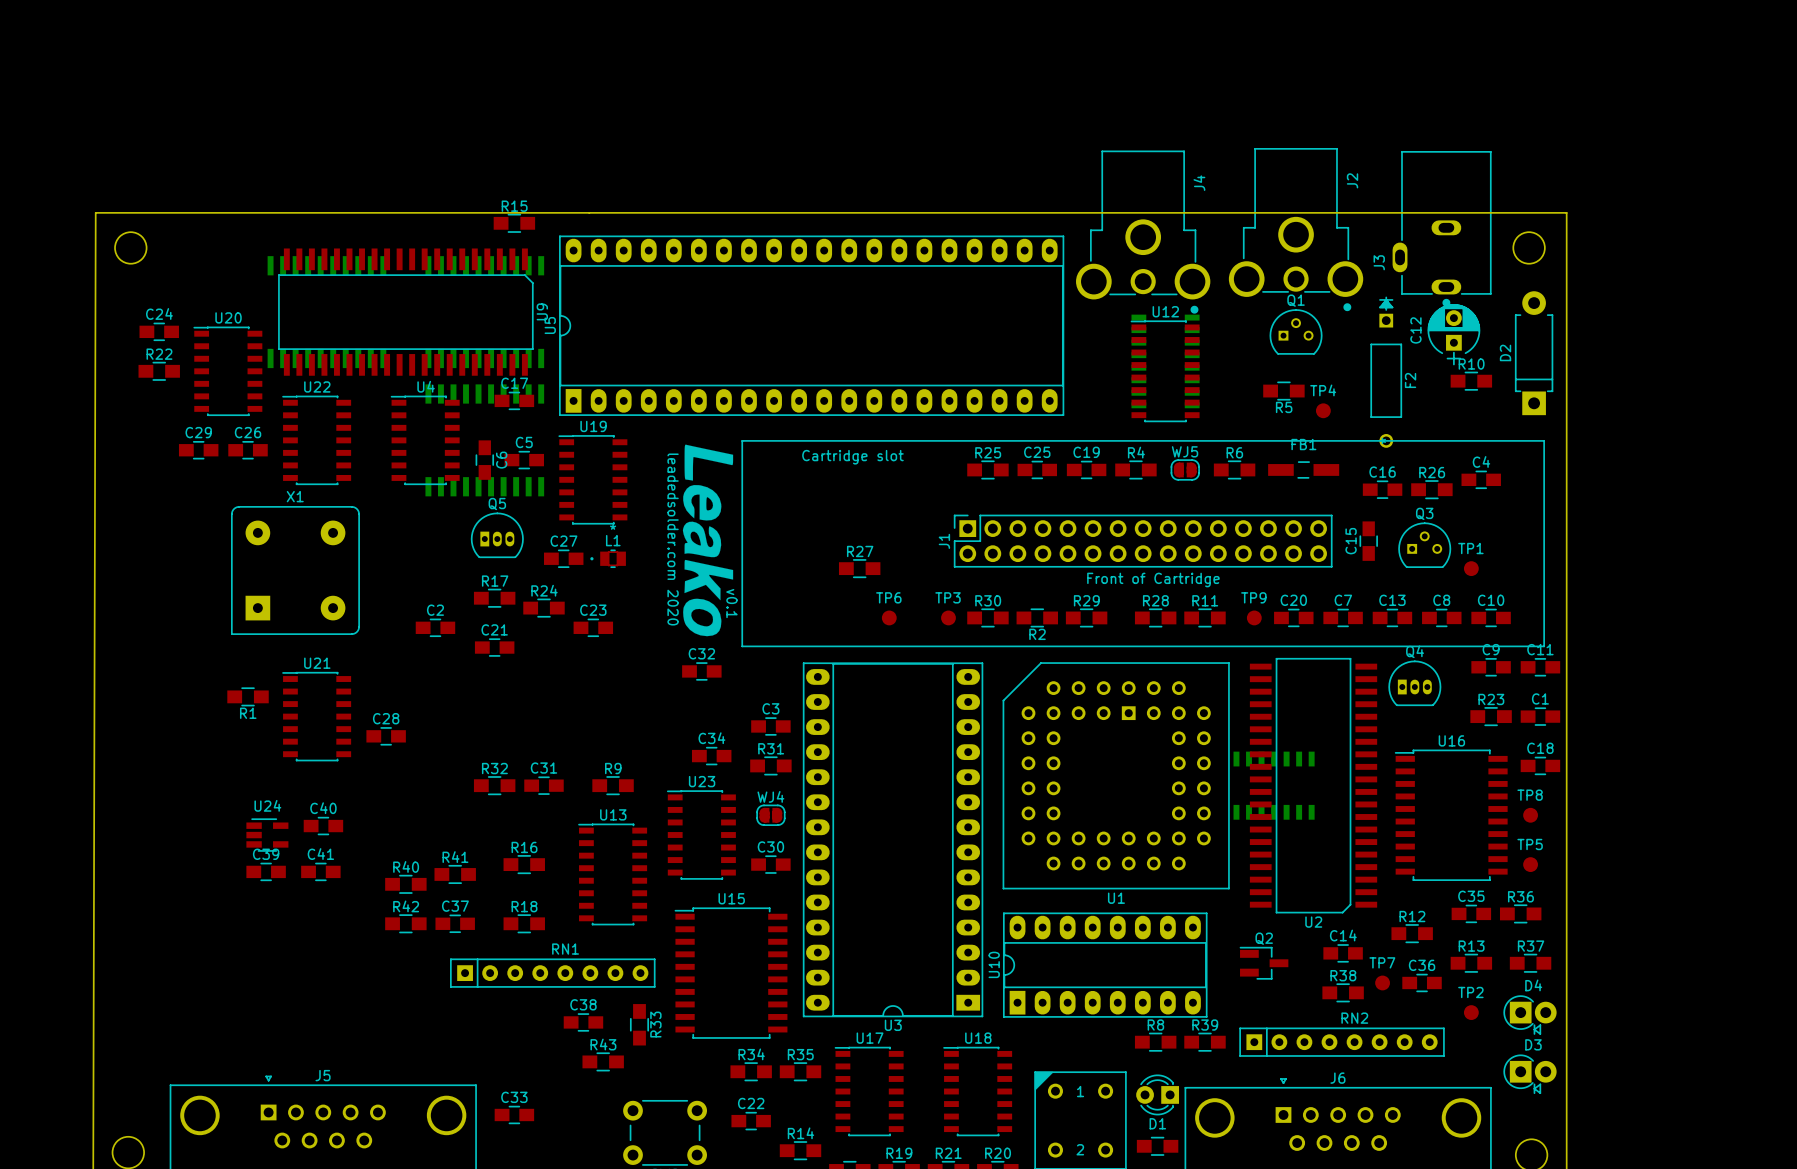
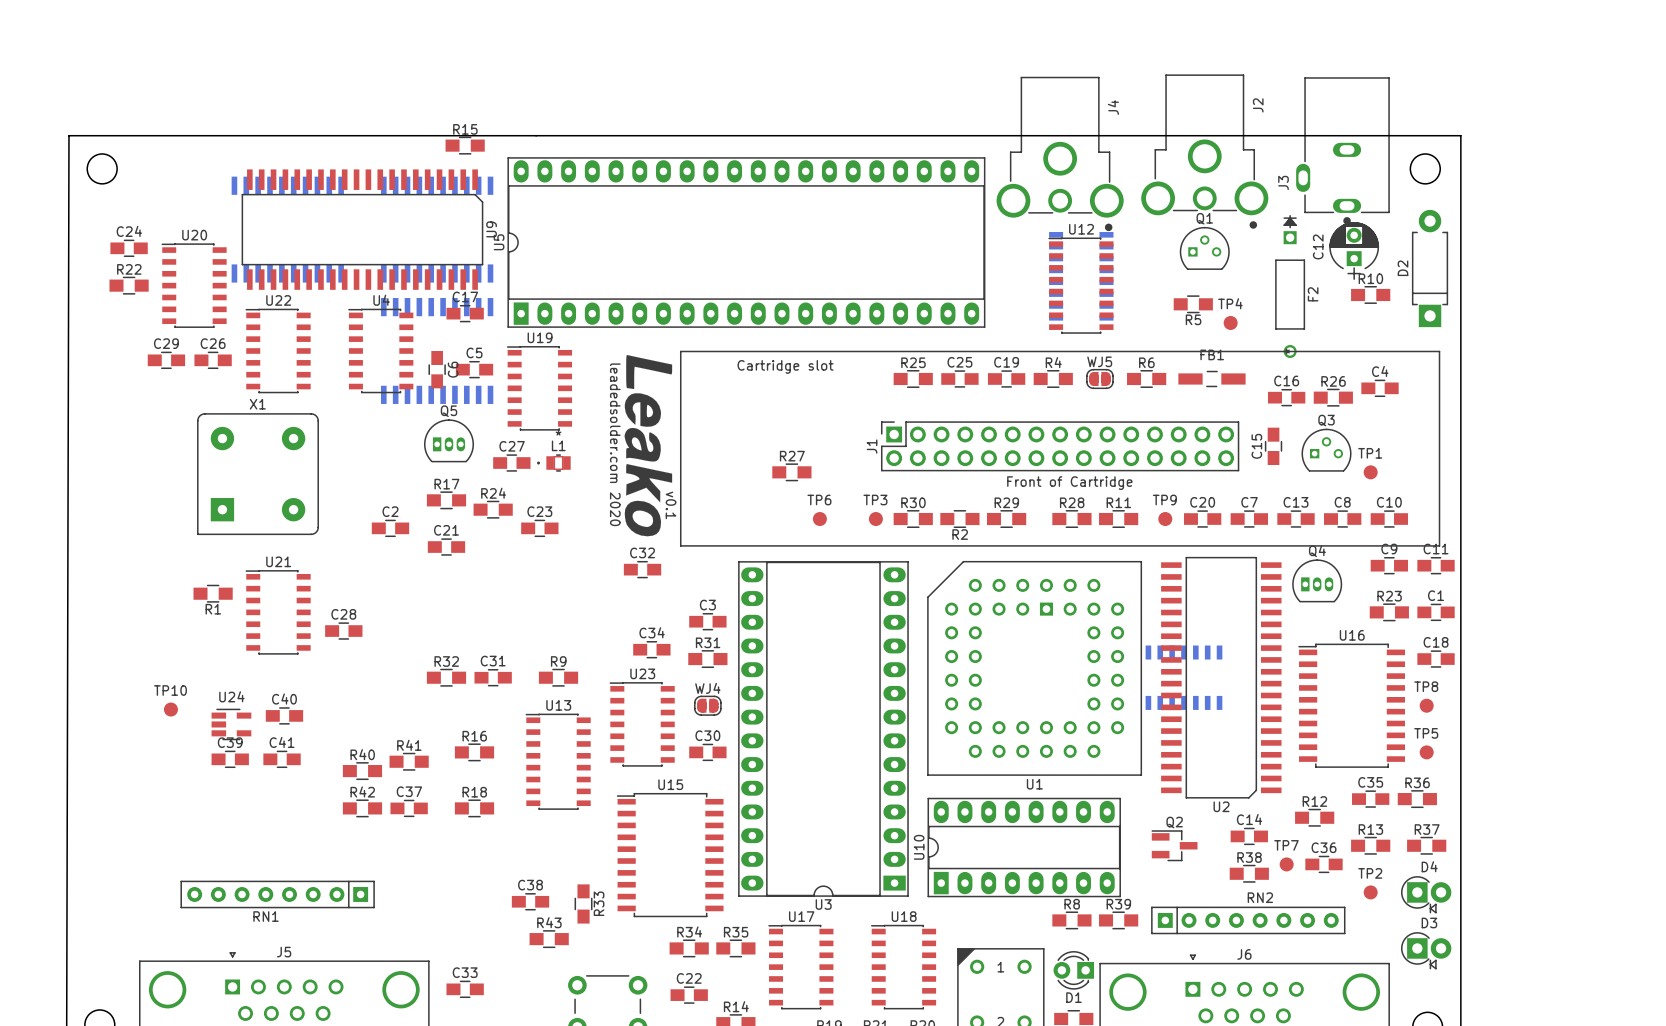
TP10: none -> (170, 709)
RN1 rotation: 0° (552, 973) -> 180° (277, 894)
RN1 position: (552, 973) -> (277, 894)

